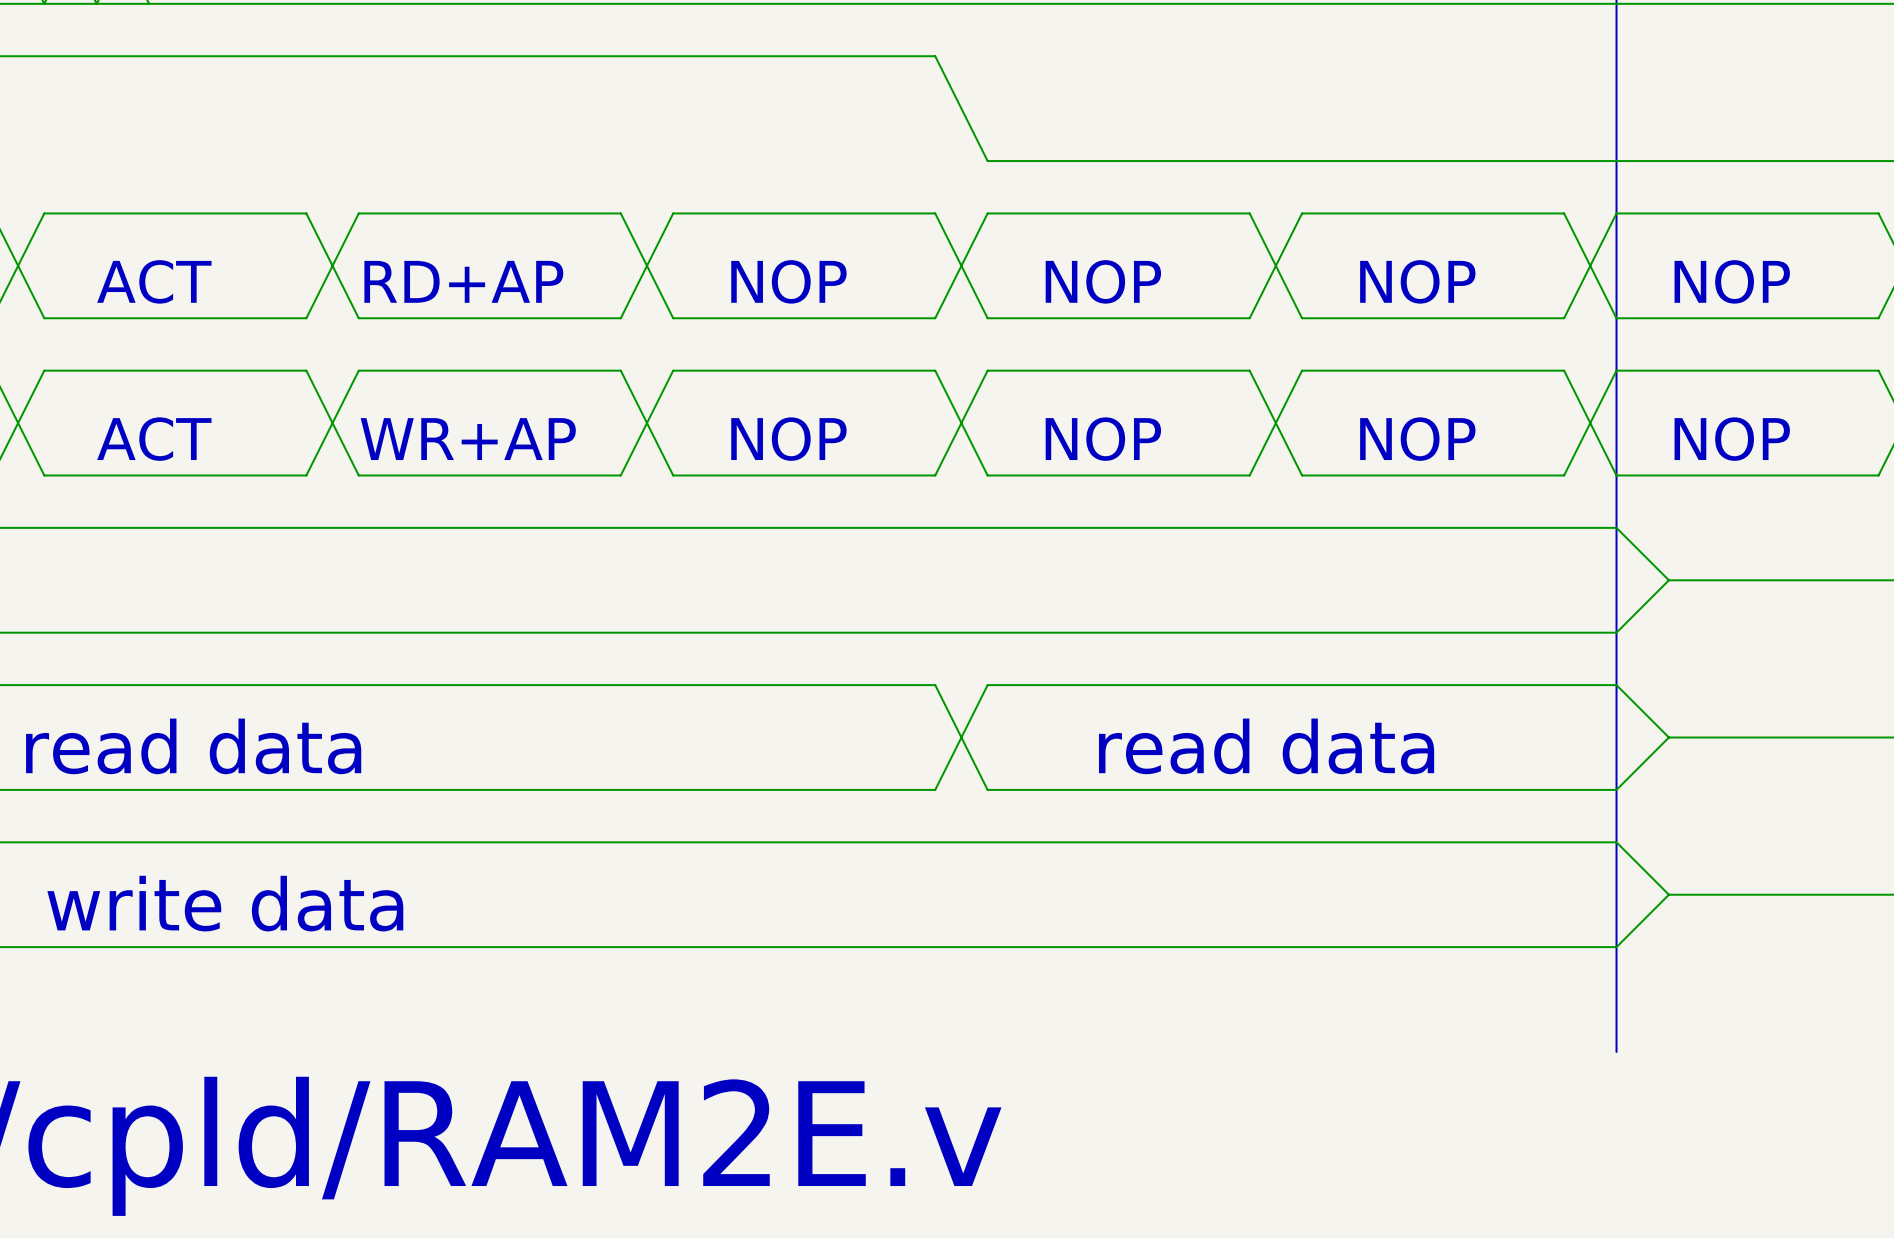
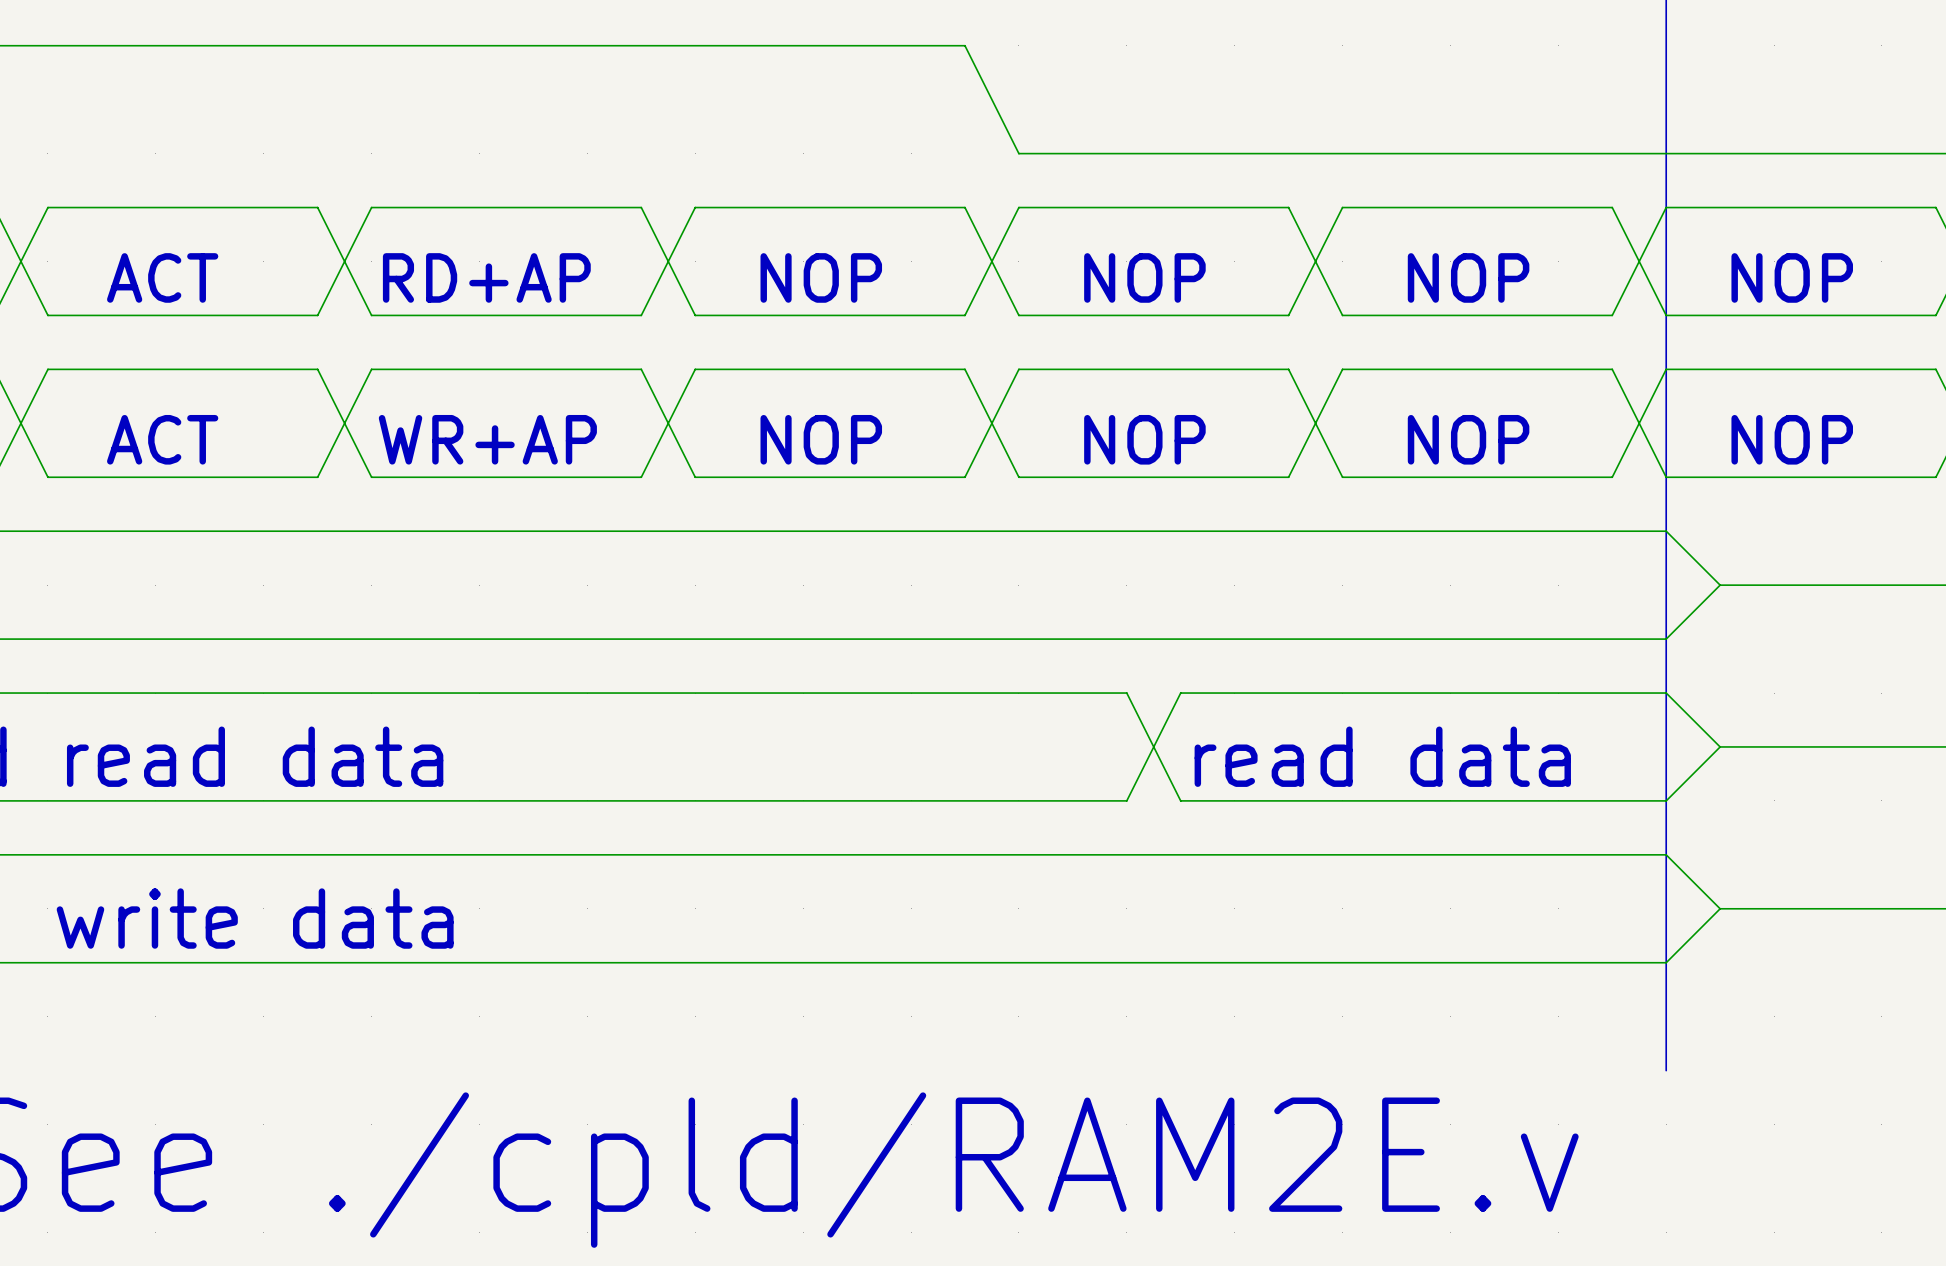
wire: (935, 685) (987, 789) -> (964, 693) (1018, 693)
wire: (987, 685) (935, 789) -> (1018, 800) (964, 800)
wire: (1092, 685) (1144, 685) -> (1126, 693) (1180, 800)
text position: read data (1266, 746) -> read data (1382, 756)
wire: (1092, 789) (1144, 789) -> (1126, 800) (1180, 693)

